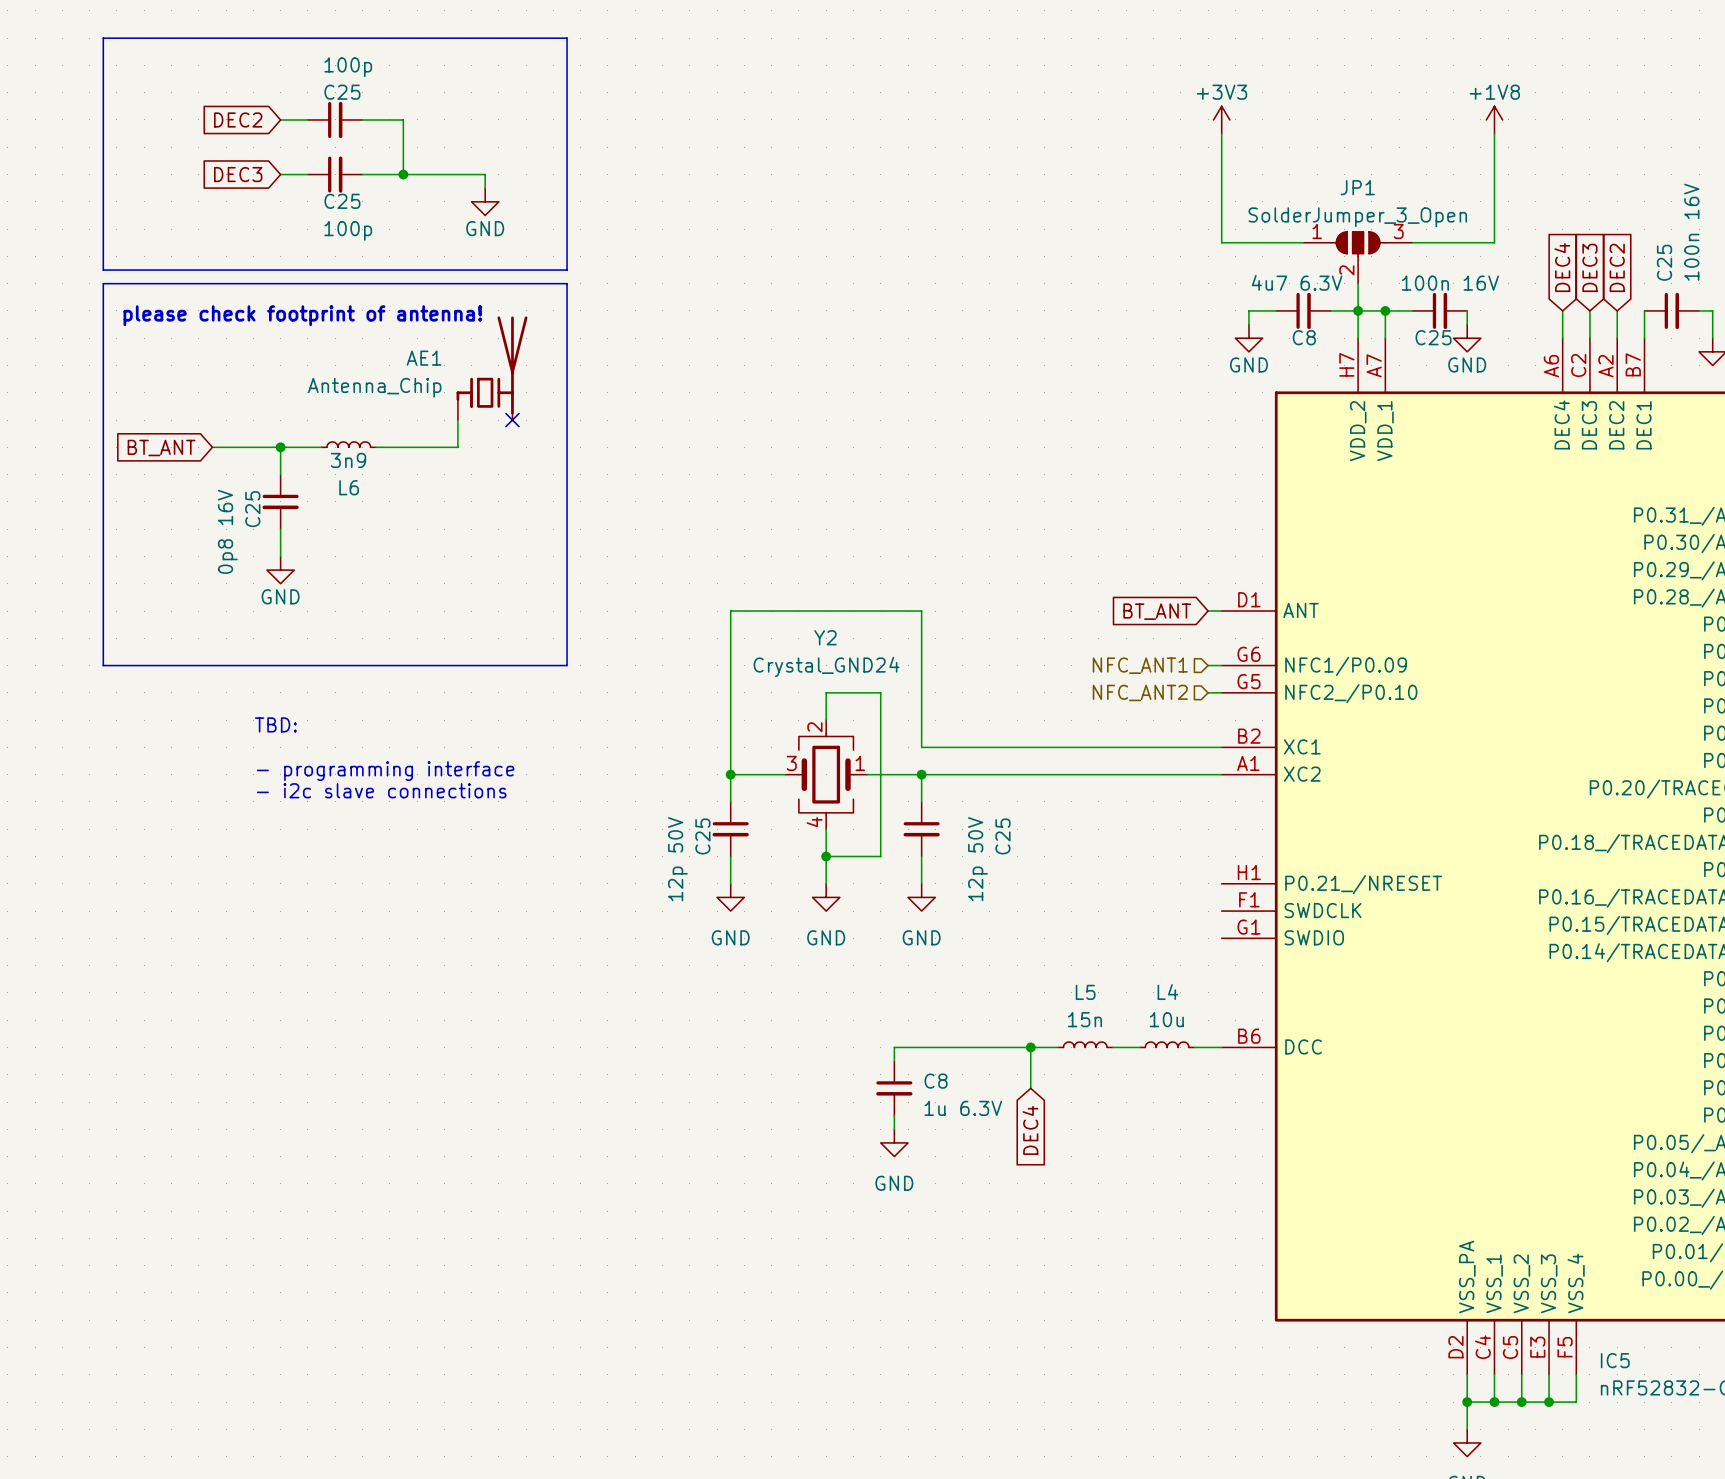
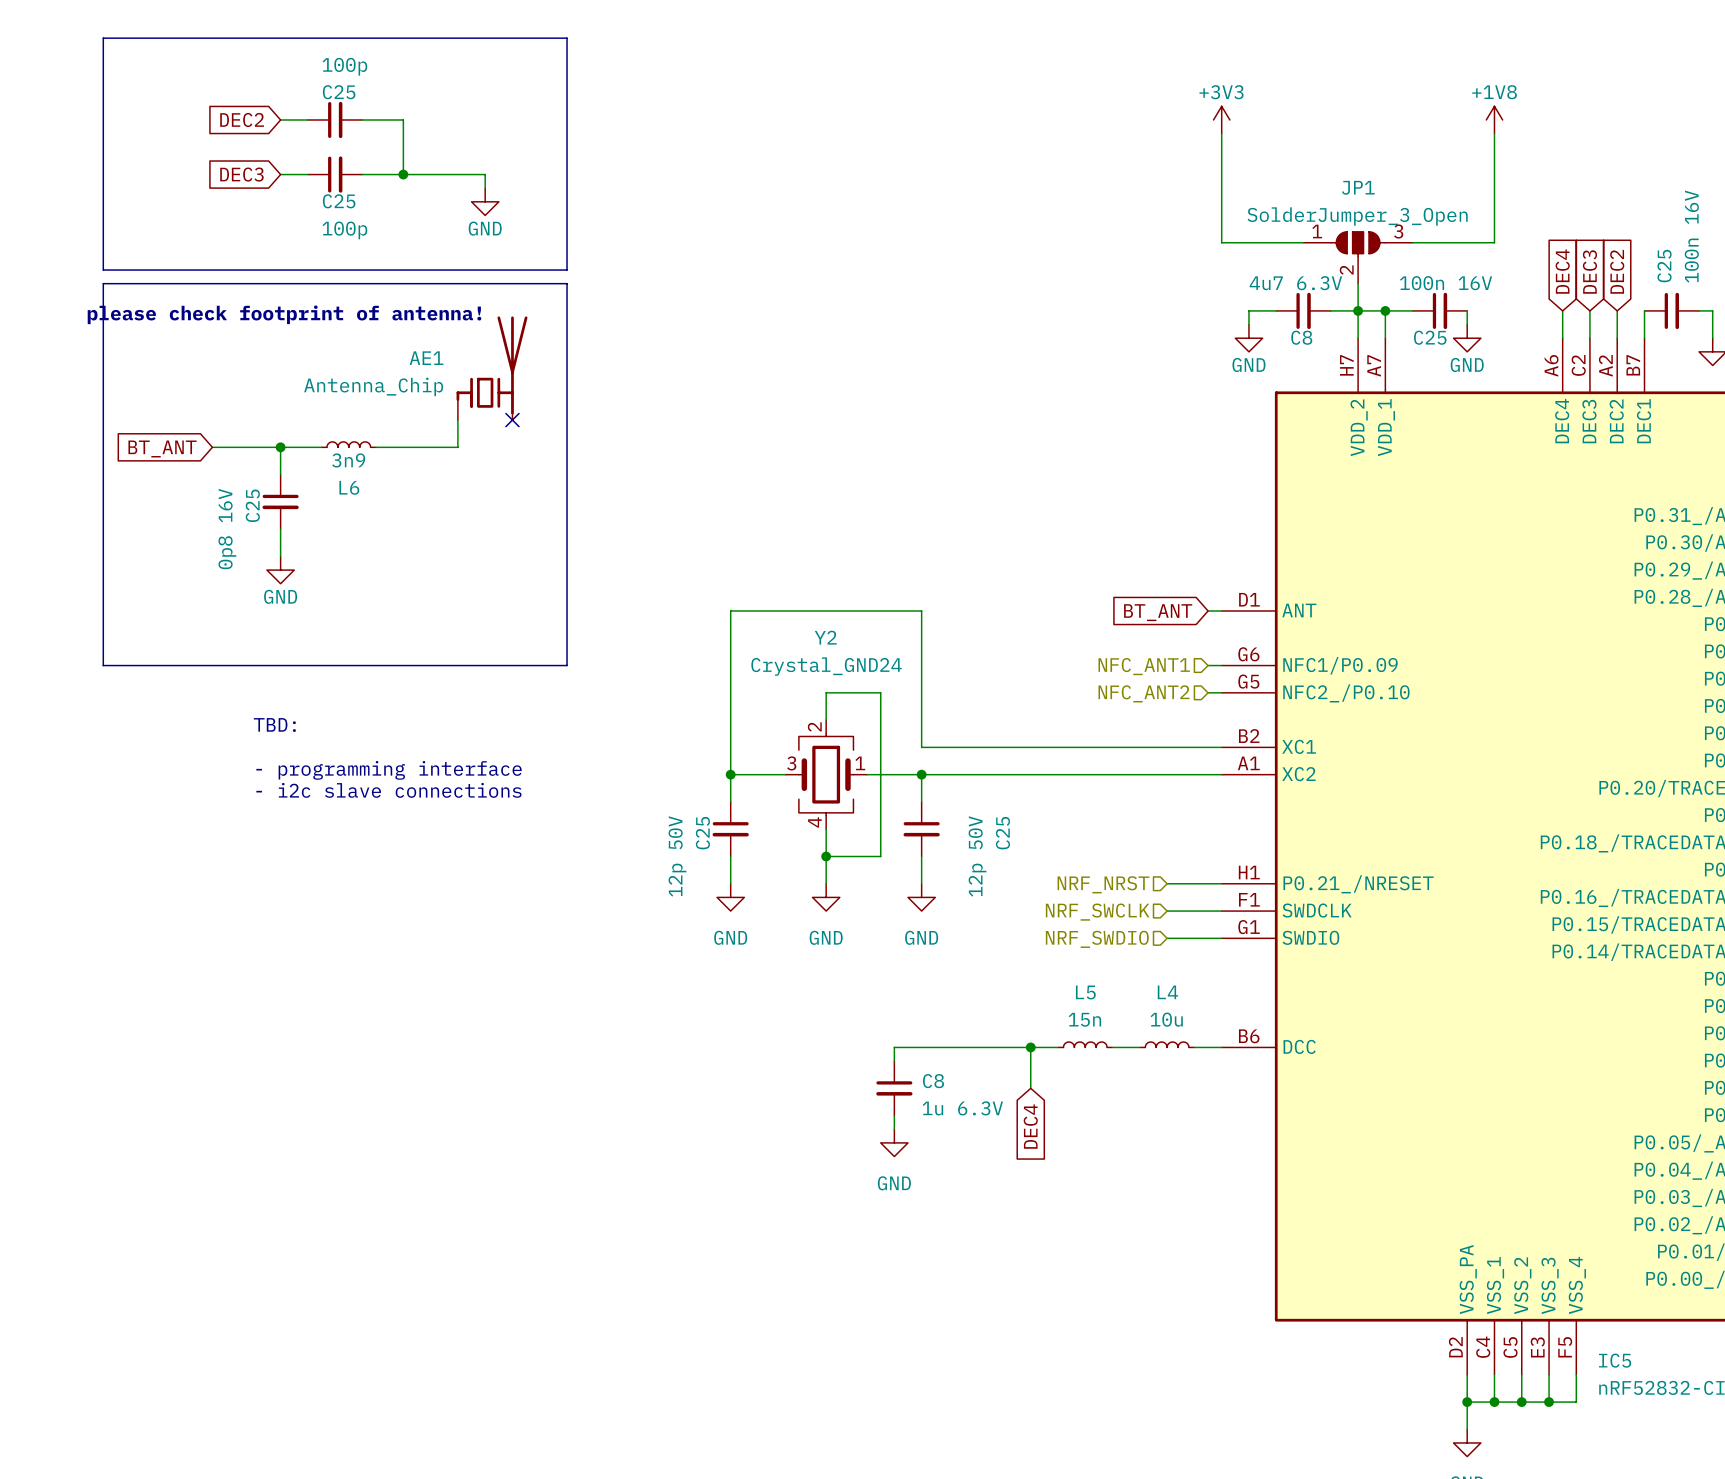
hierarchical label: none -> NRF_NRST (1103, 884)
wire: none -> (1167, 883) (1221, 883)
hierarchical label: none -> NRF_SWCLK (1097, 912)
wire: none -> (1167, 911) (1221, 911)
hierarchical label: none -> NRF_SWDIO (1097, 939)
wire: none -> (1167, 938) (1221, 938)

